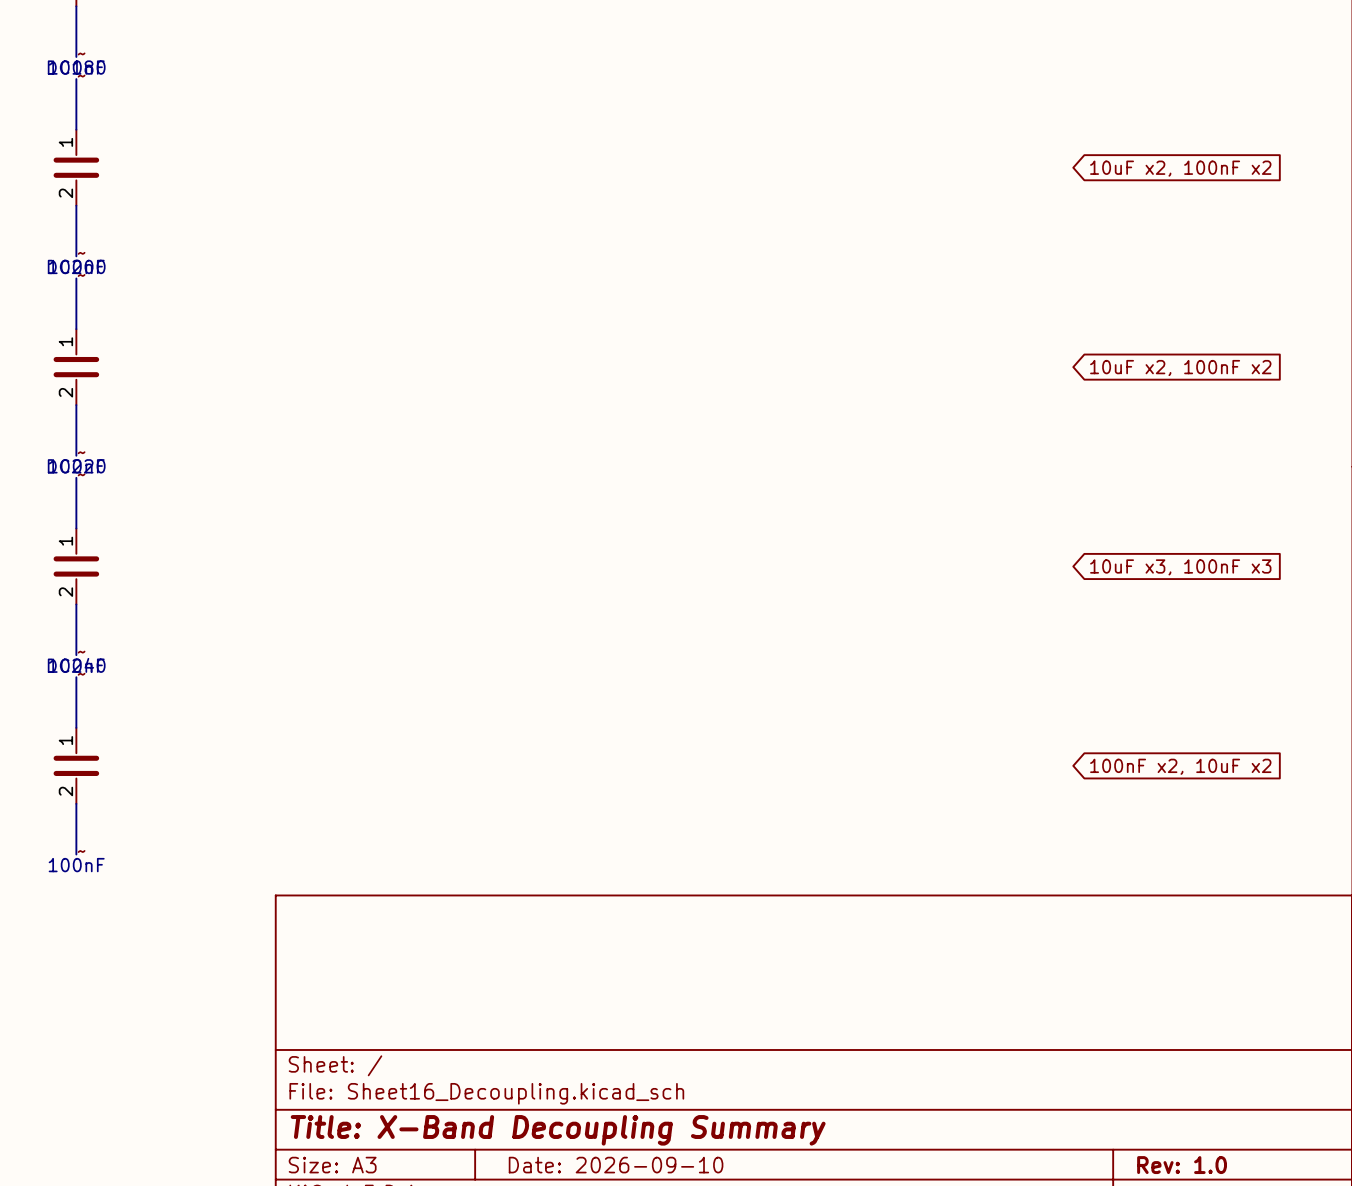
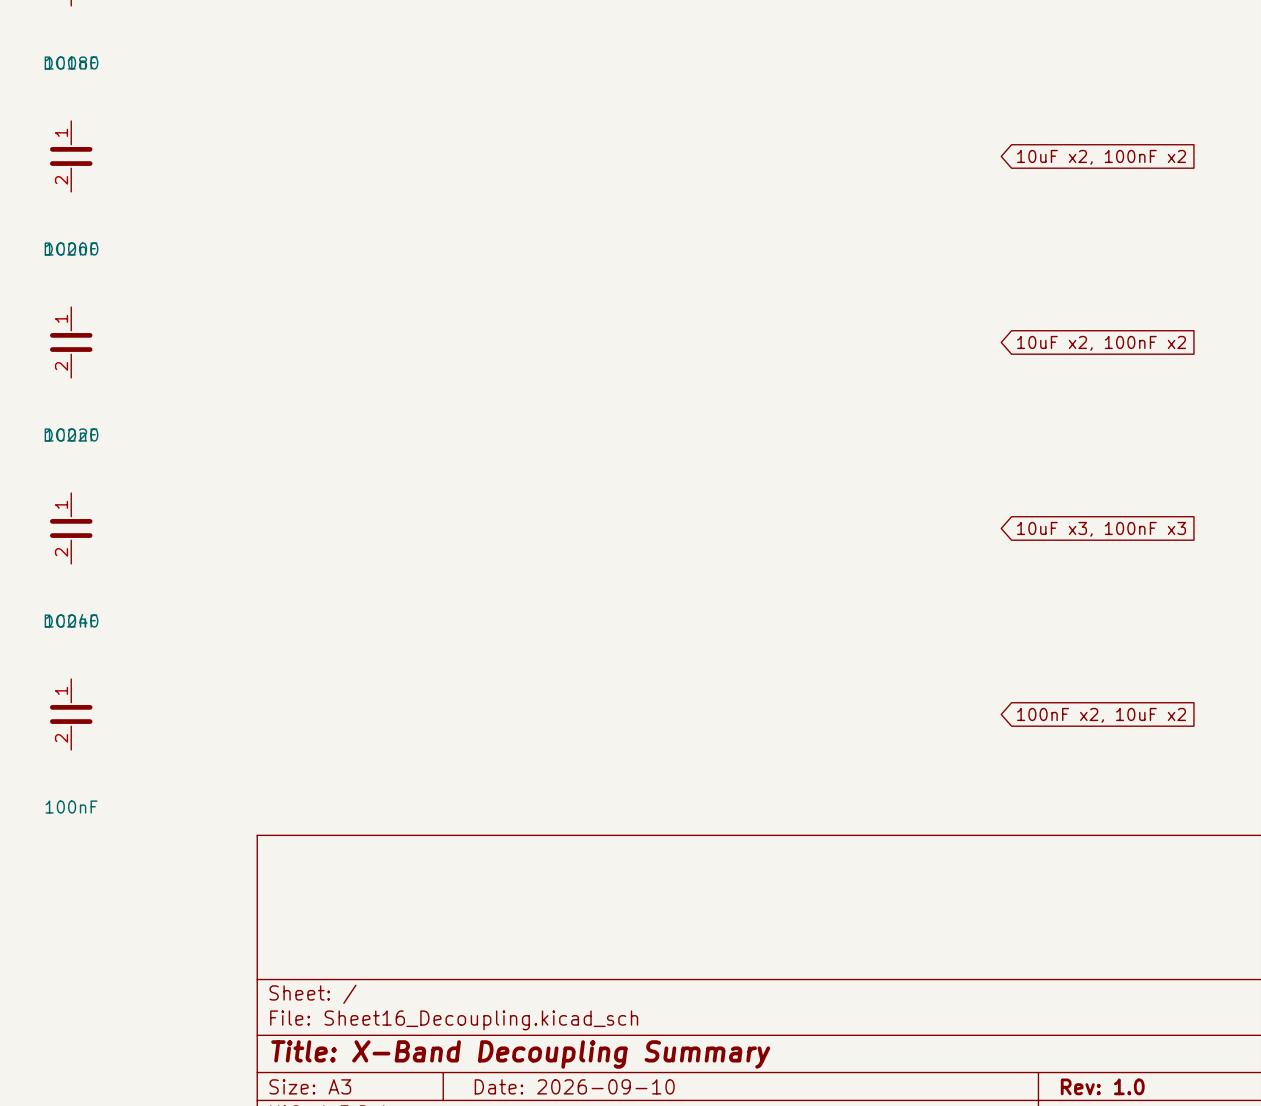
wire: (76, 6) (76, 56) -> none
label: ~ (81, 53) -> none
label: ~ (81, 76) -> none
wire: (76, 79) (76, 129) -> none
wire: (76, 205) (76, 256) -> none
label: ~ (81, 253) -> none
label: ~ (81, 275) -> none
wire: (76, 278) (76, 329) -> none
wire: (76, 405) (76, 455) -> none
label: ~ (81, 452) -> none
label: ~ (81, 474) -> none
wire: (76, 477) (76, 528) -> none
wire: (76, 604) (76, 655) -> none
label: ~ (81, 652) -> none
label: ~ (81, 674) -> none
wire: (76, 677) (76, 727) -> none
wire: (76, 803) (76, 854) -> none
label: ~ (81, 851) -> none

